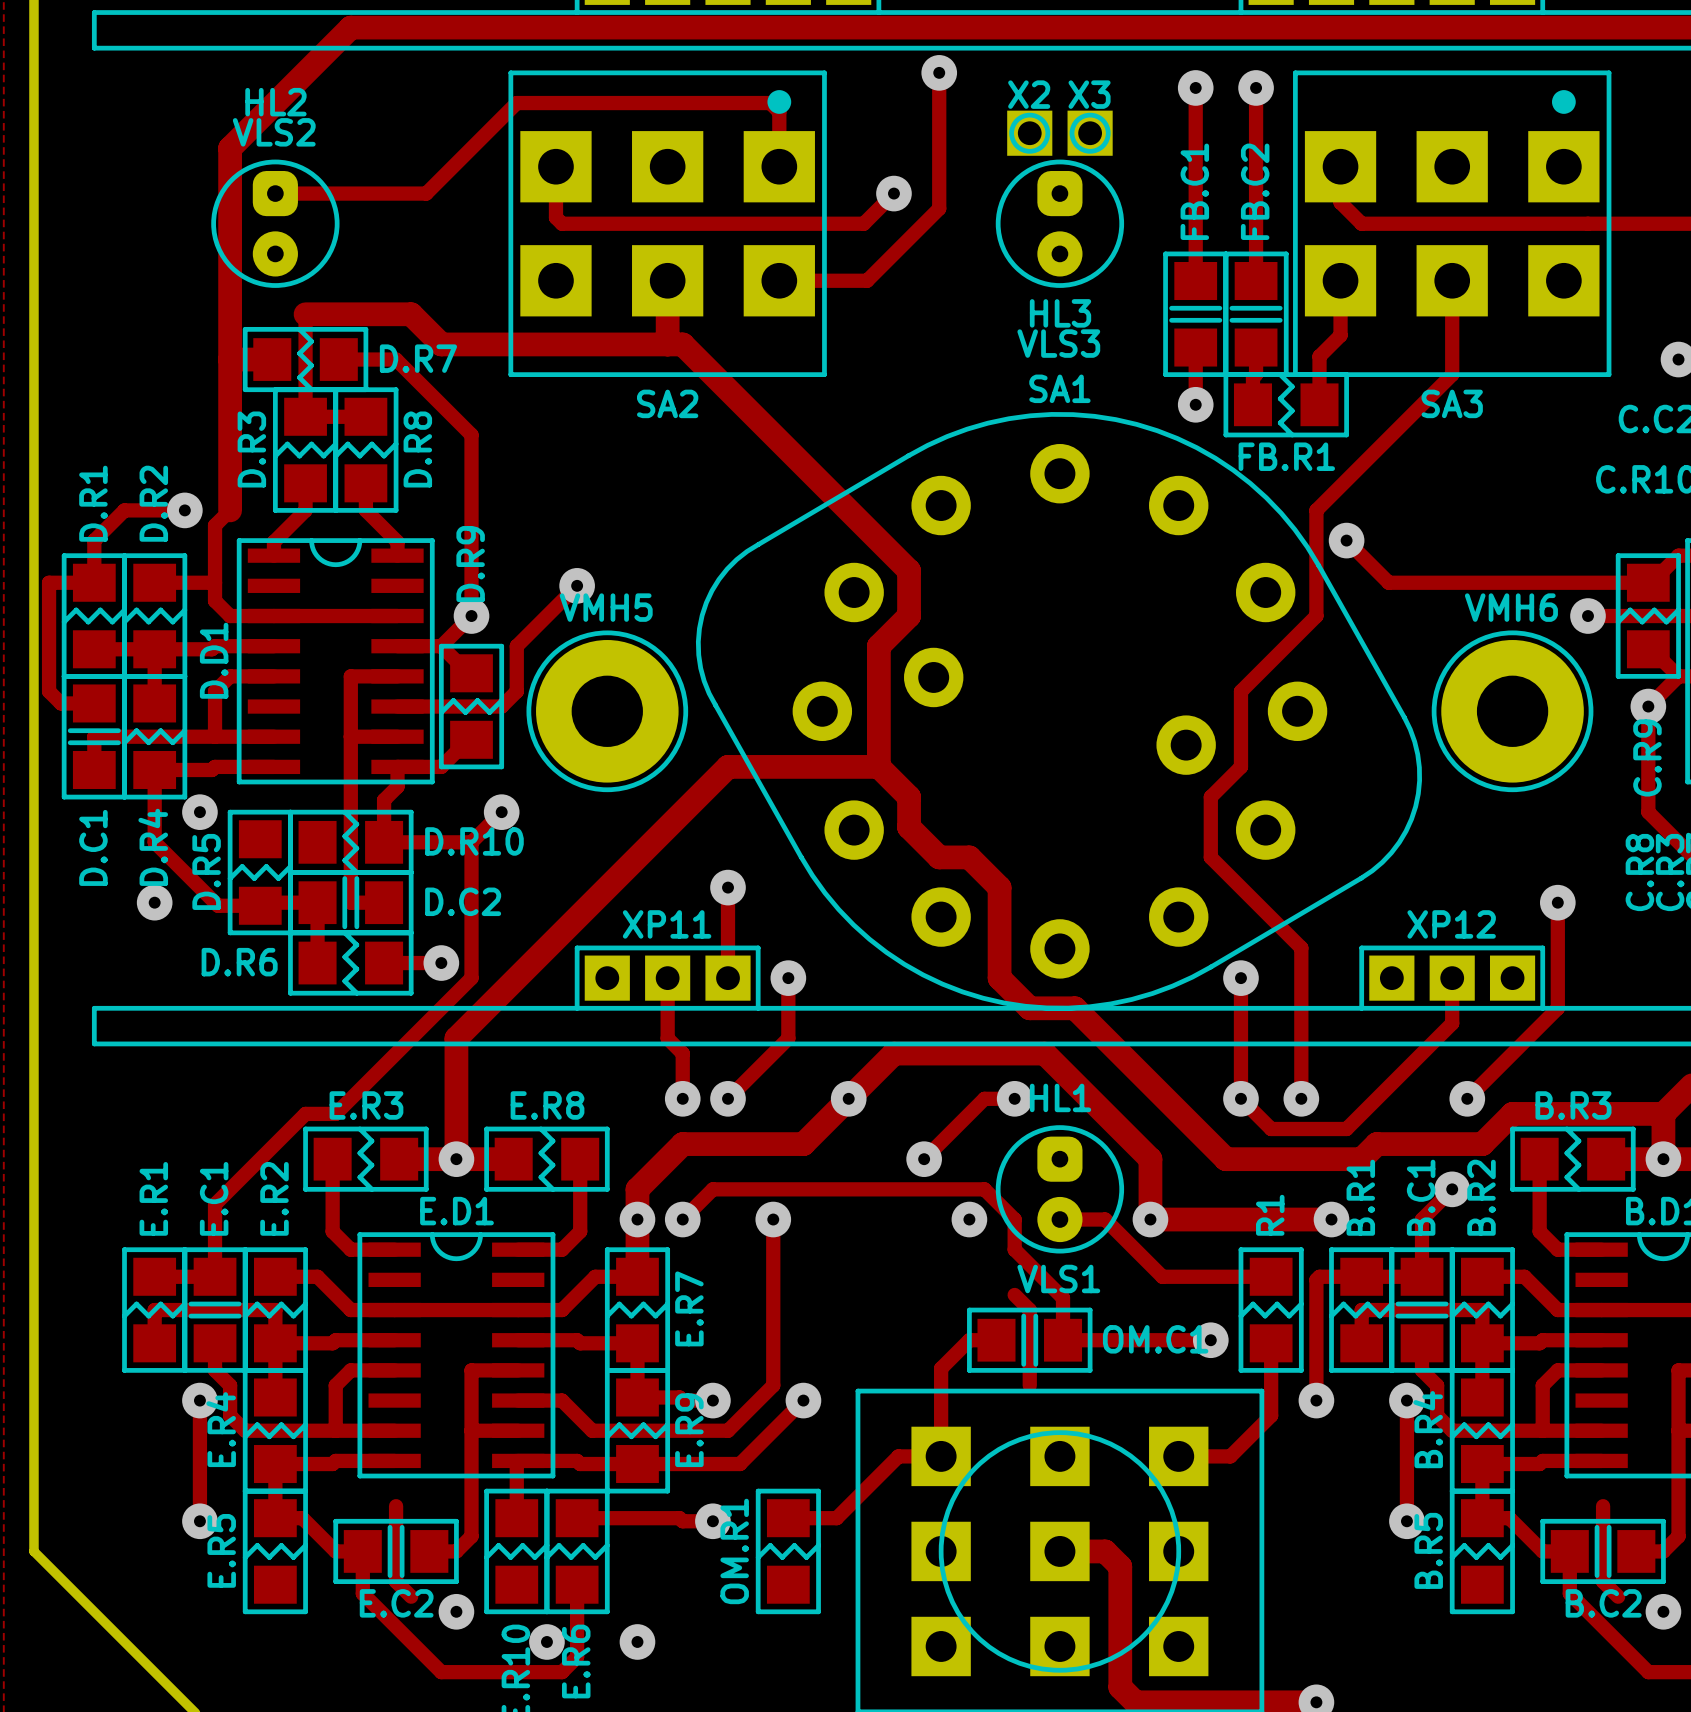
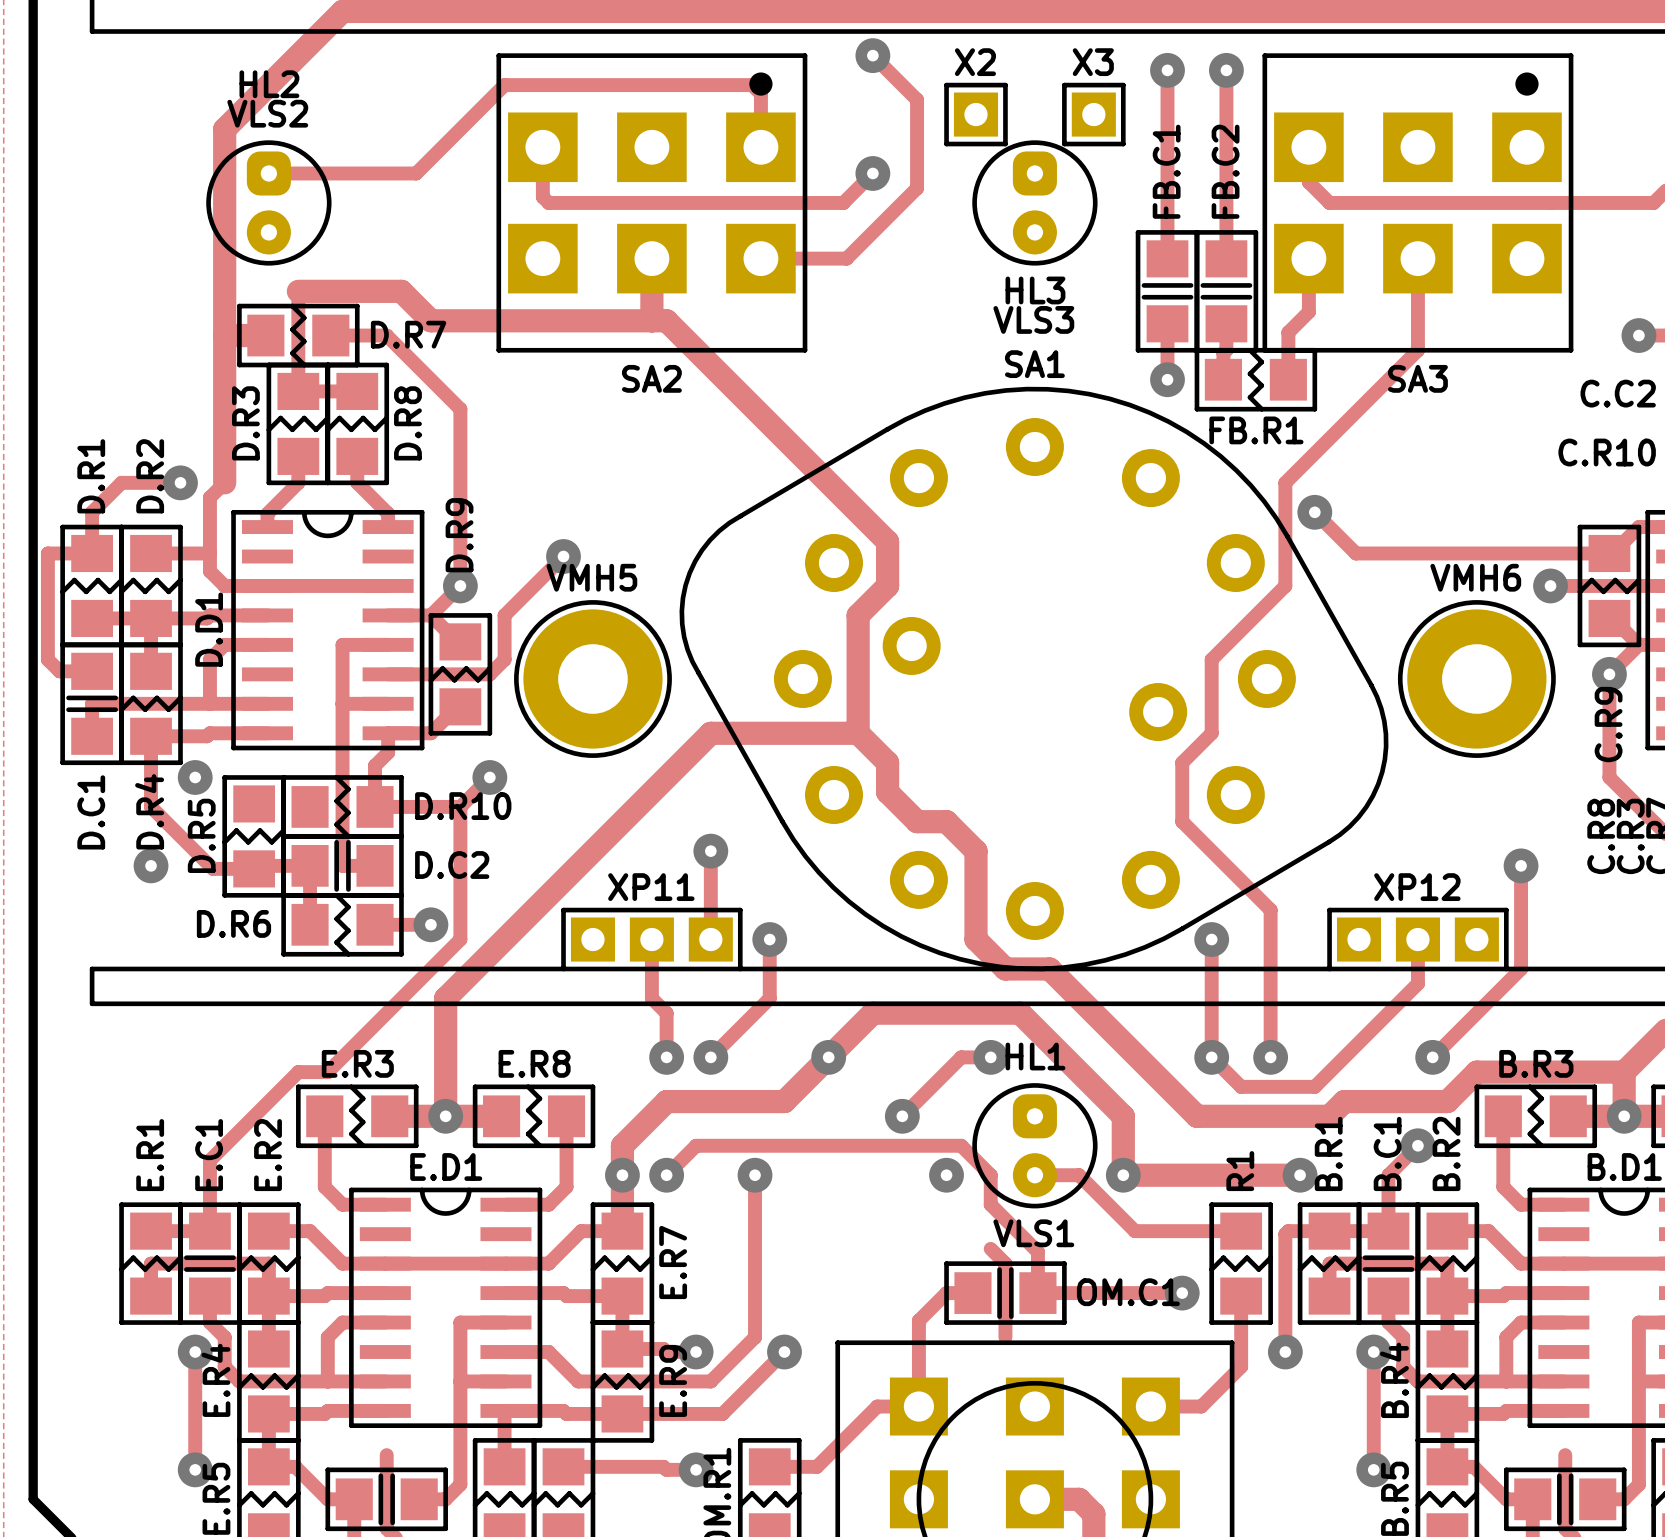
track: (939, 72) (939, 118) -> (872, 55) (917, 99)
via position: (939, 72) -> (872, 55)
X2 footprint: [1007, 110, 1053, 156] -> [944, 82, 1008, 147]
X3 footprint: [1067, 110, 1113, 156] -> [1062, 82, 1126, 147]

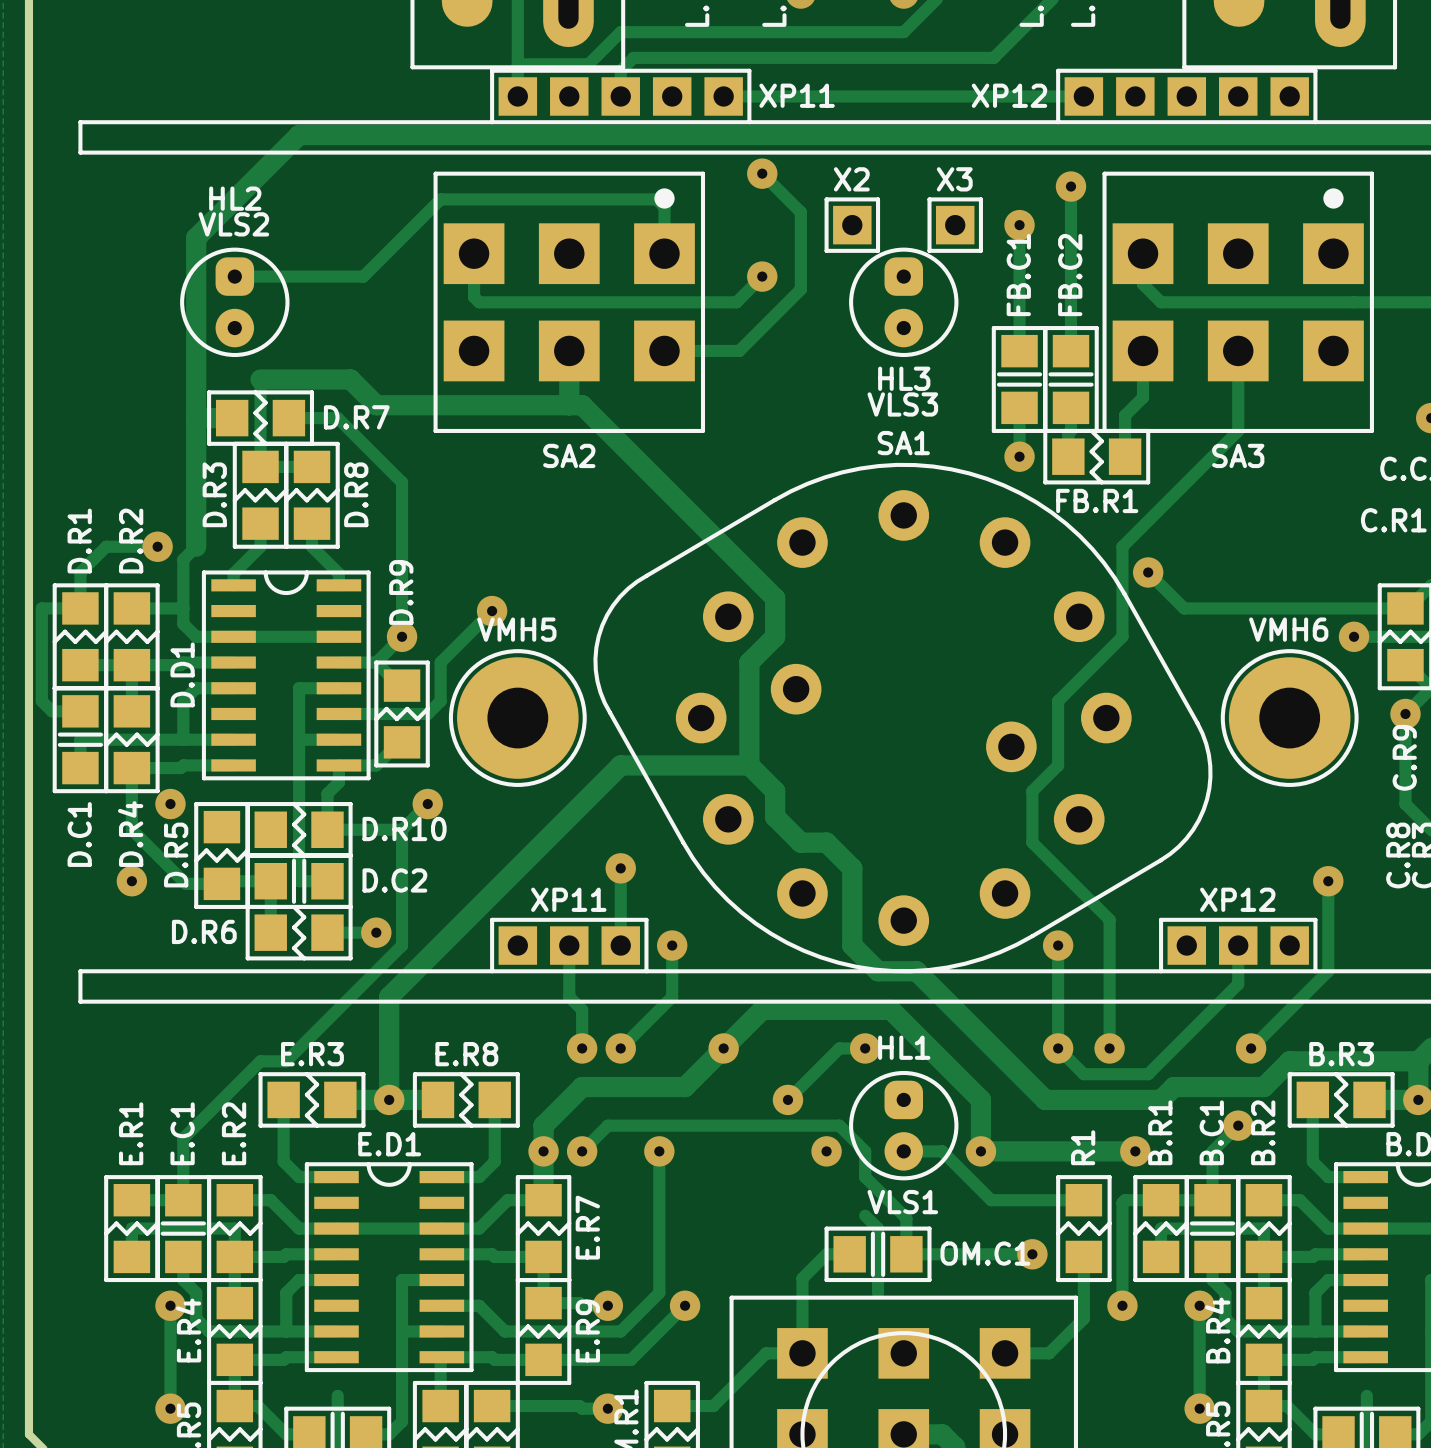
track: (1167, 70) (1167, 114) -> none
via position: (1167, 70) -> (1019, 225)

